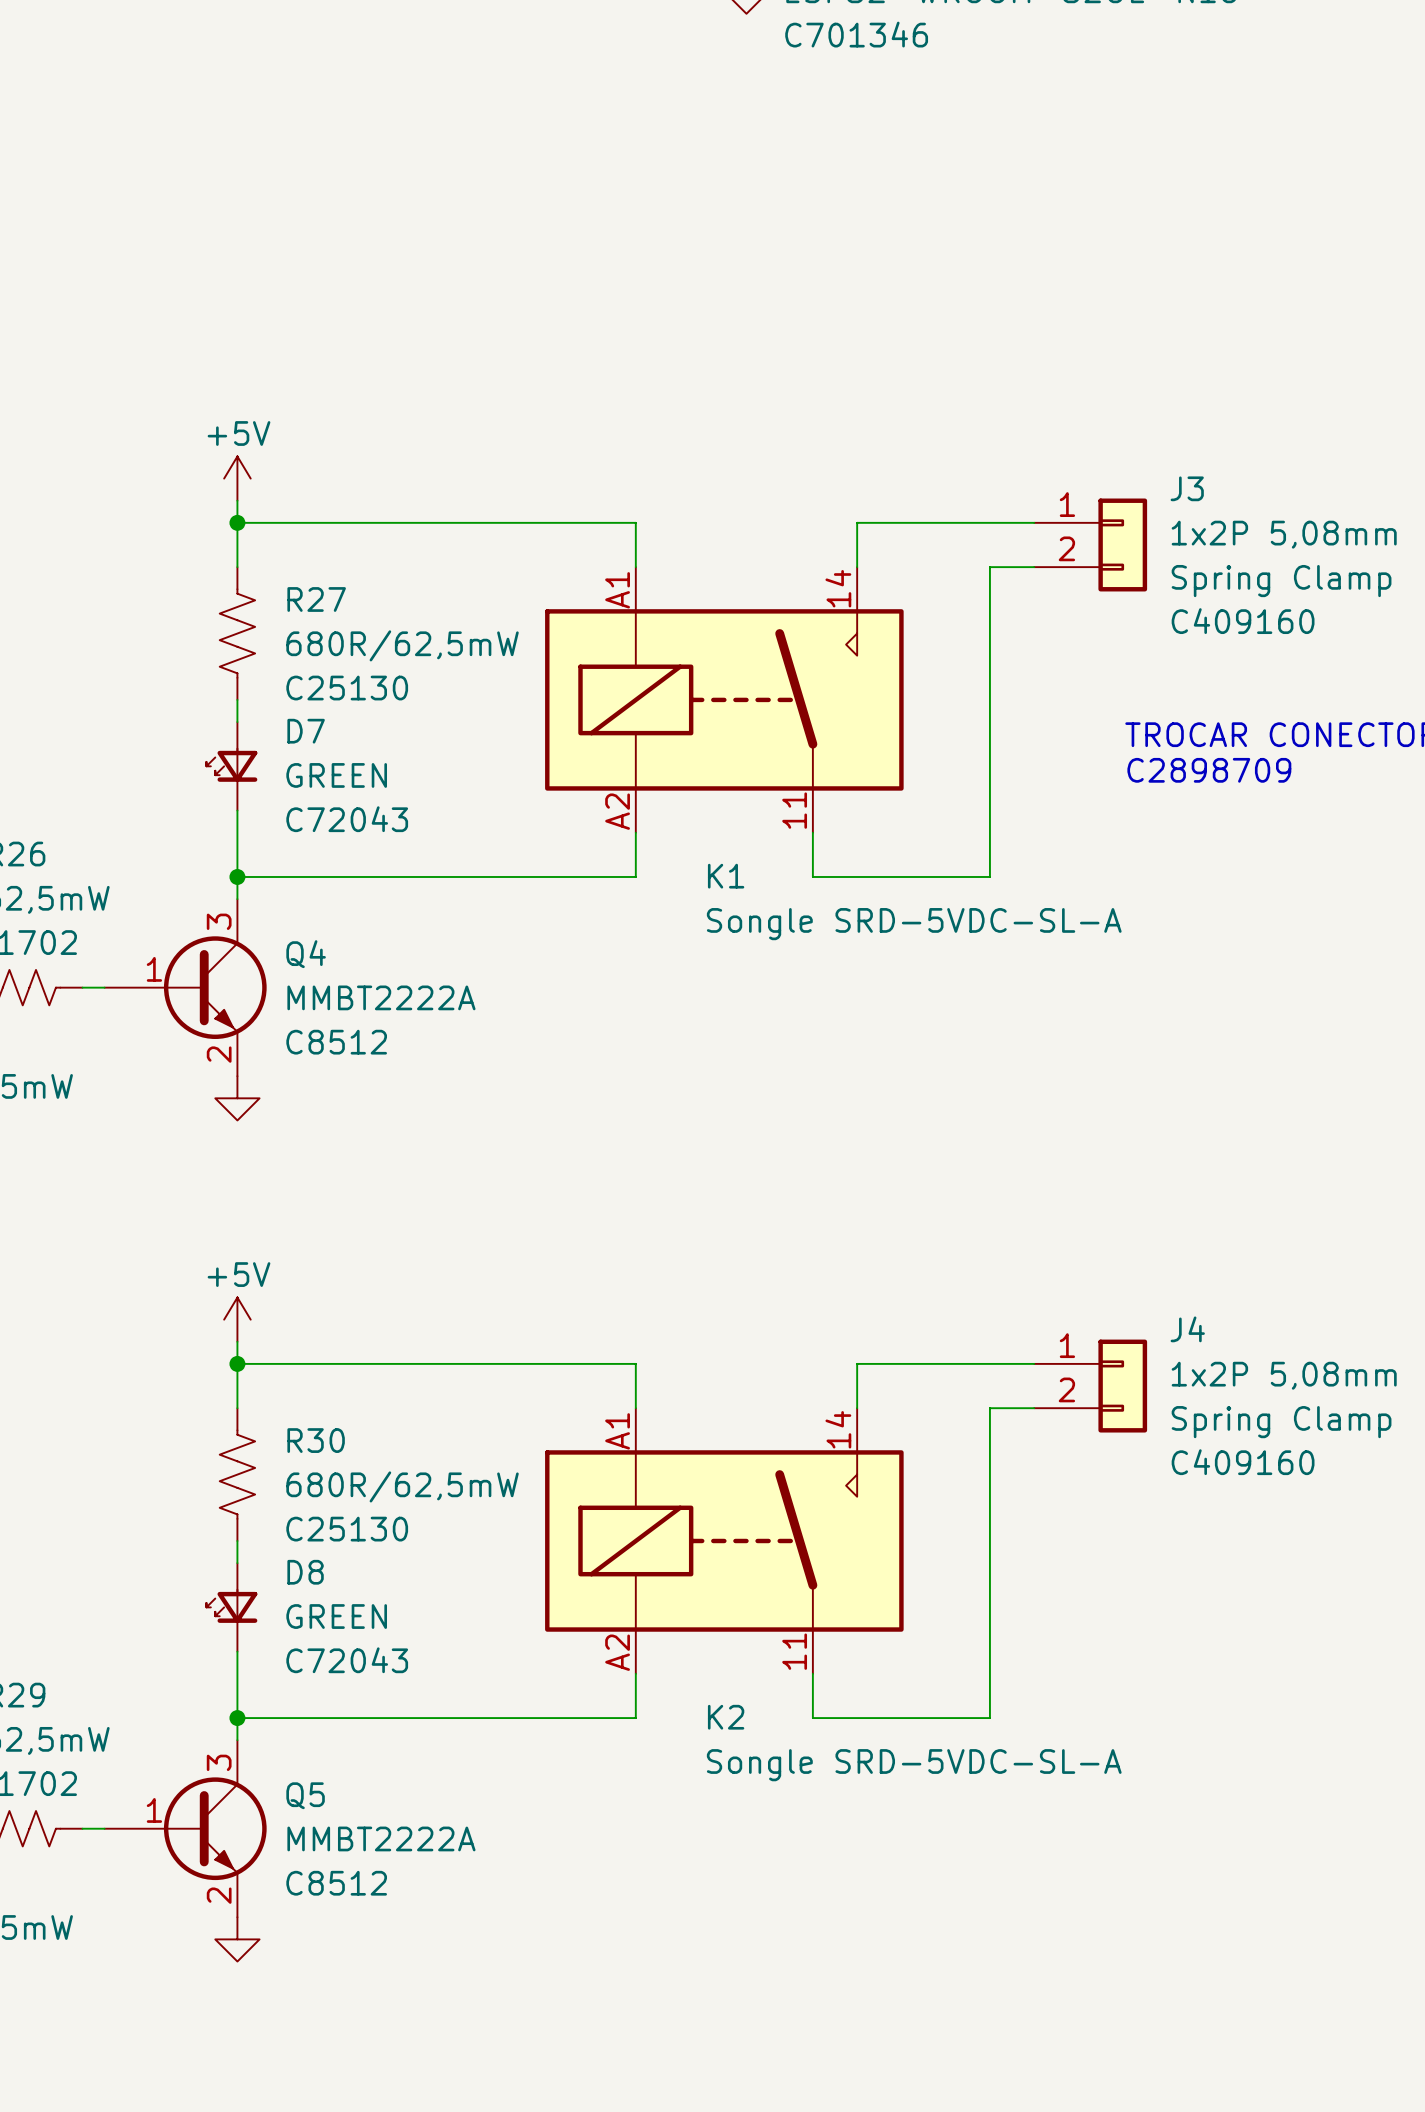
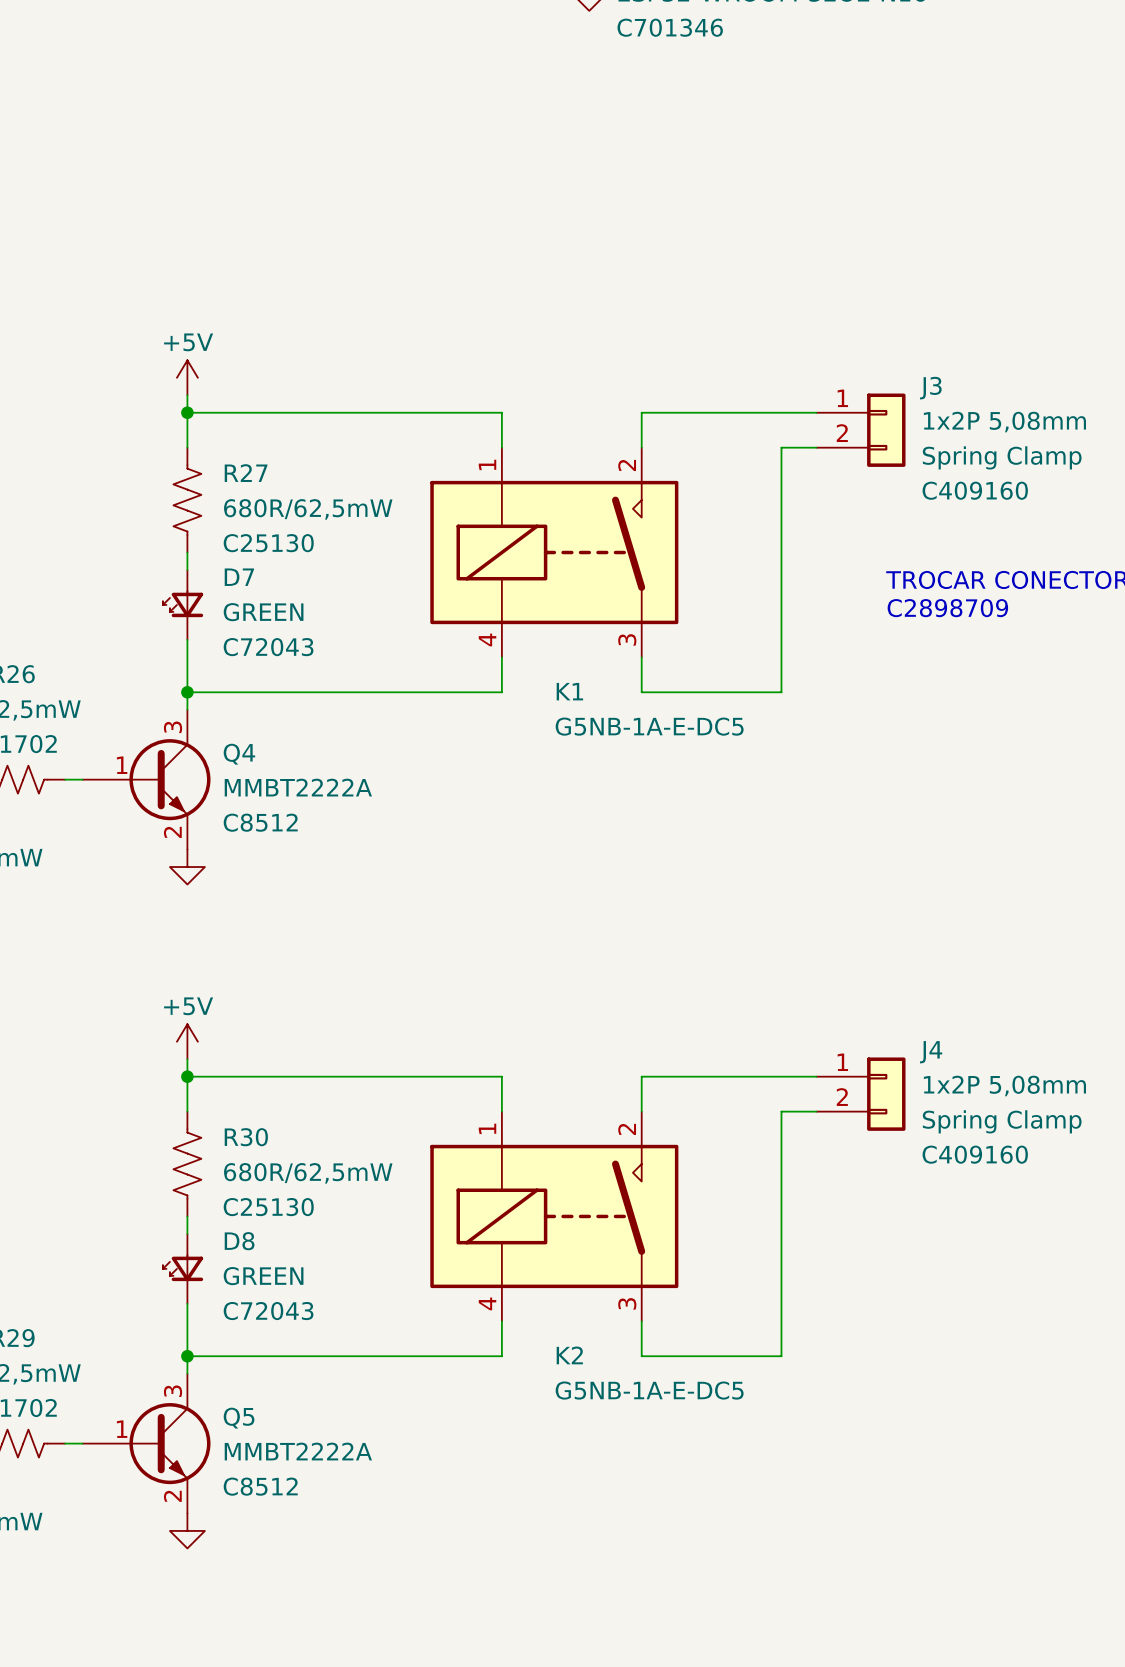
wire: (857, 522) (857, 567) -> (676, 412) (641, 412) (641, 447)
K1 symbol: [545, 567, 904, 833] -> [430, 447, 679, 658]
K1 value: Songle SRD-5VDC-SL-A (914, 924) -> G5NB-1A-E-DC5 (649, 726)
wire: (857, 1363) (857, 1408) -> (676, 1076) (641, 1076) (641, 1111)
K2 symbol: [545, 1408, 904, 1674] -> [430, 1111, 679, 1322]
K2 value: Songle SRD-5VDC-SL-A (914, 1765) -> G5NB-1A-E-DC5 (649, 1390)

